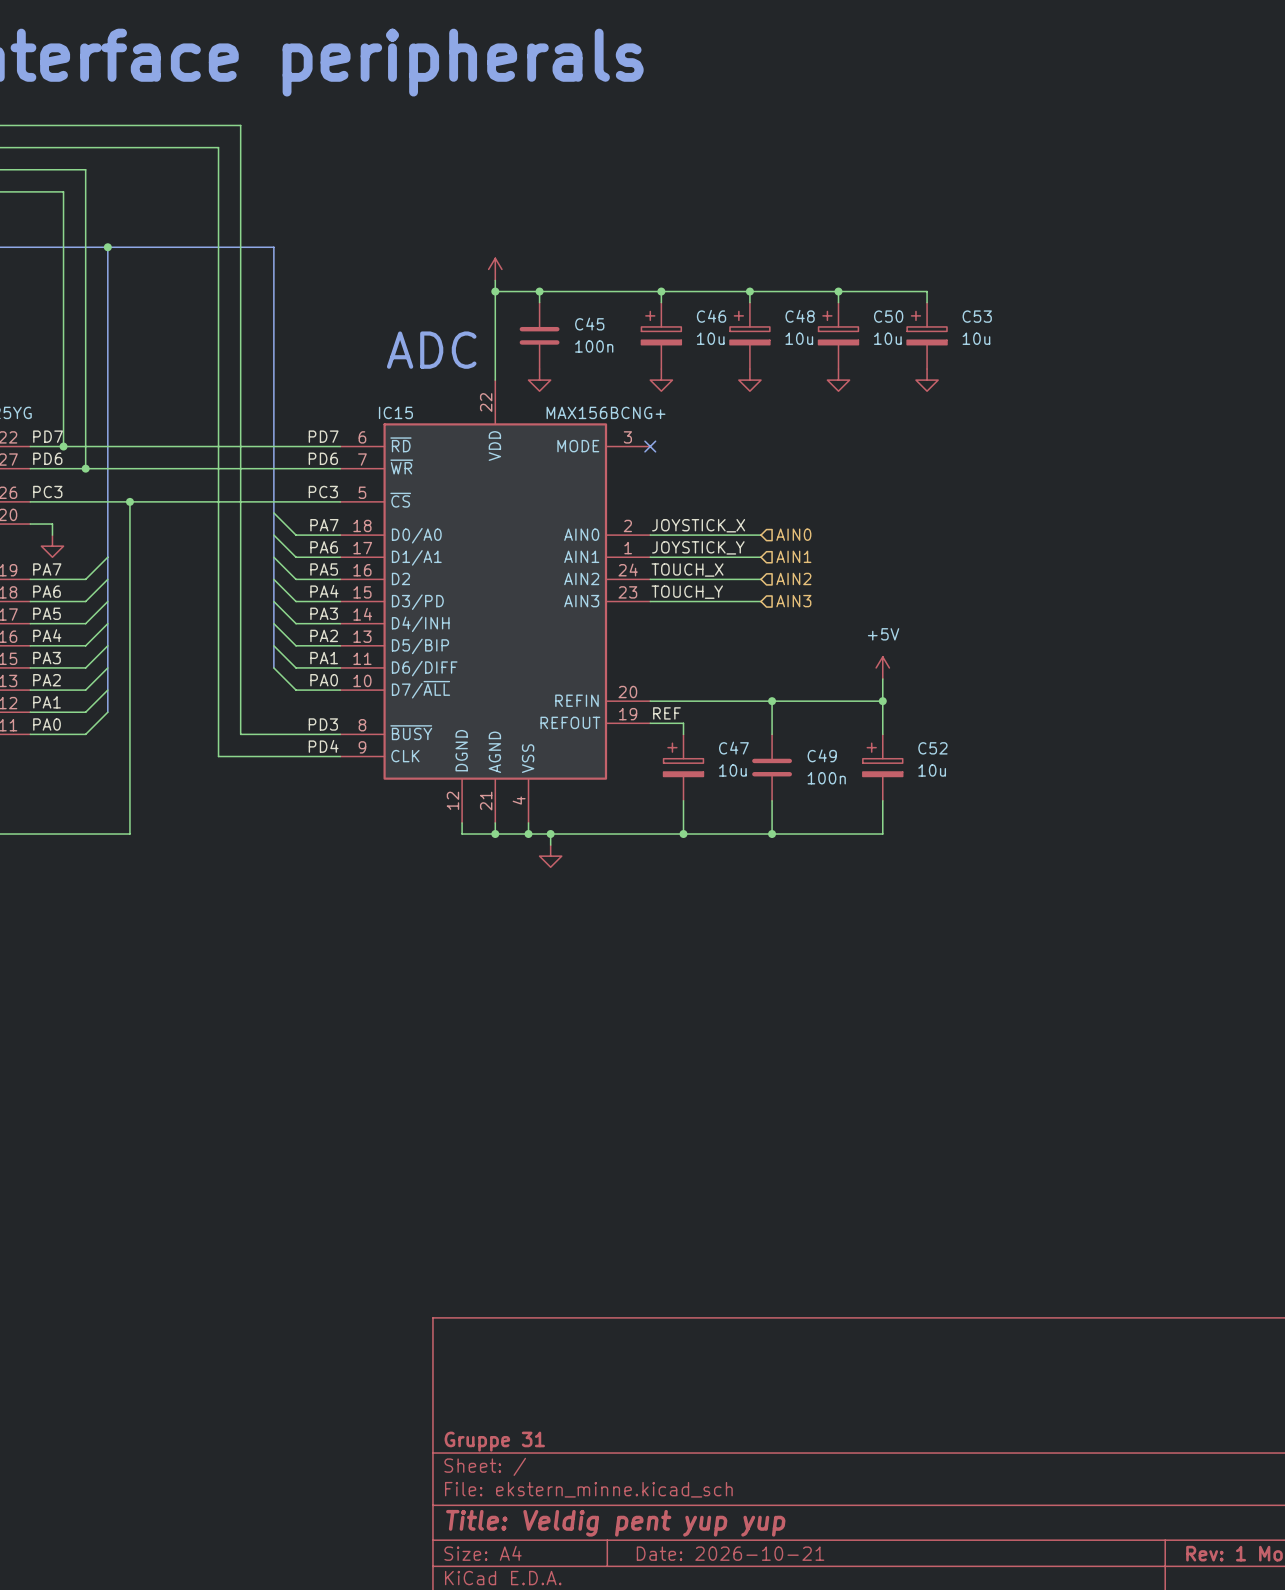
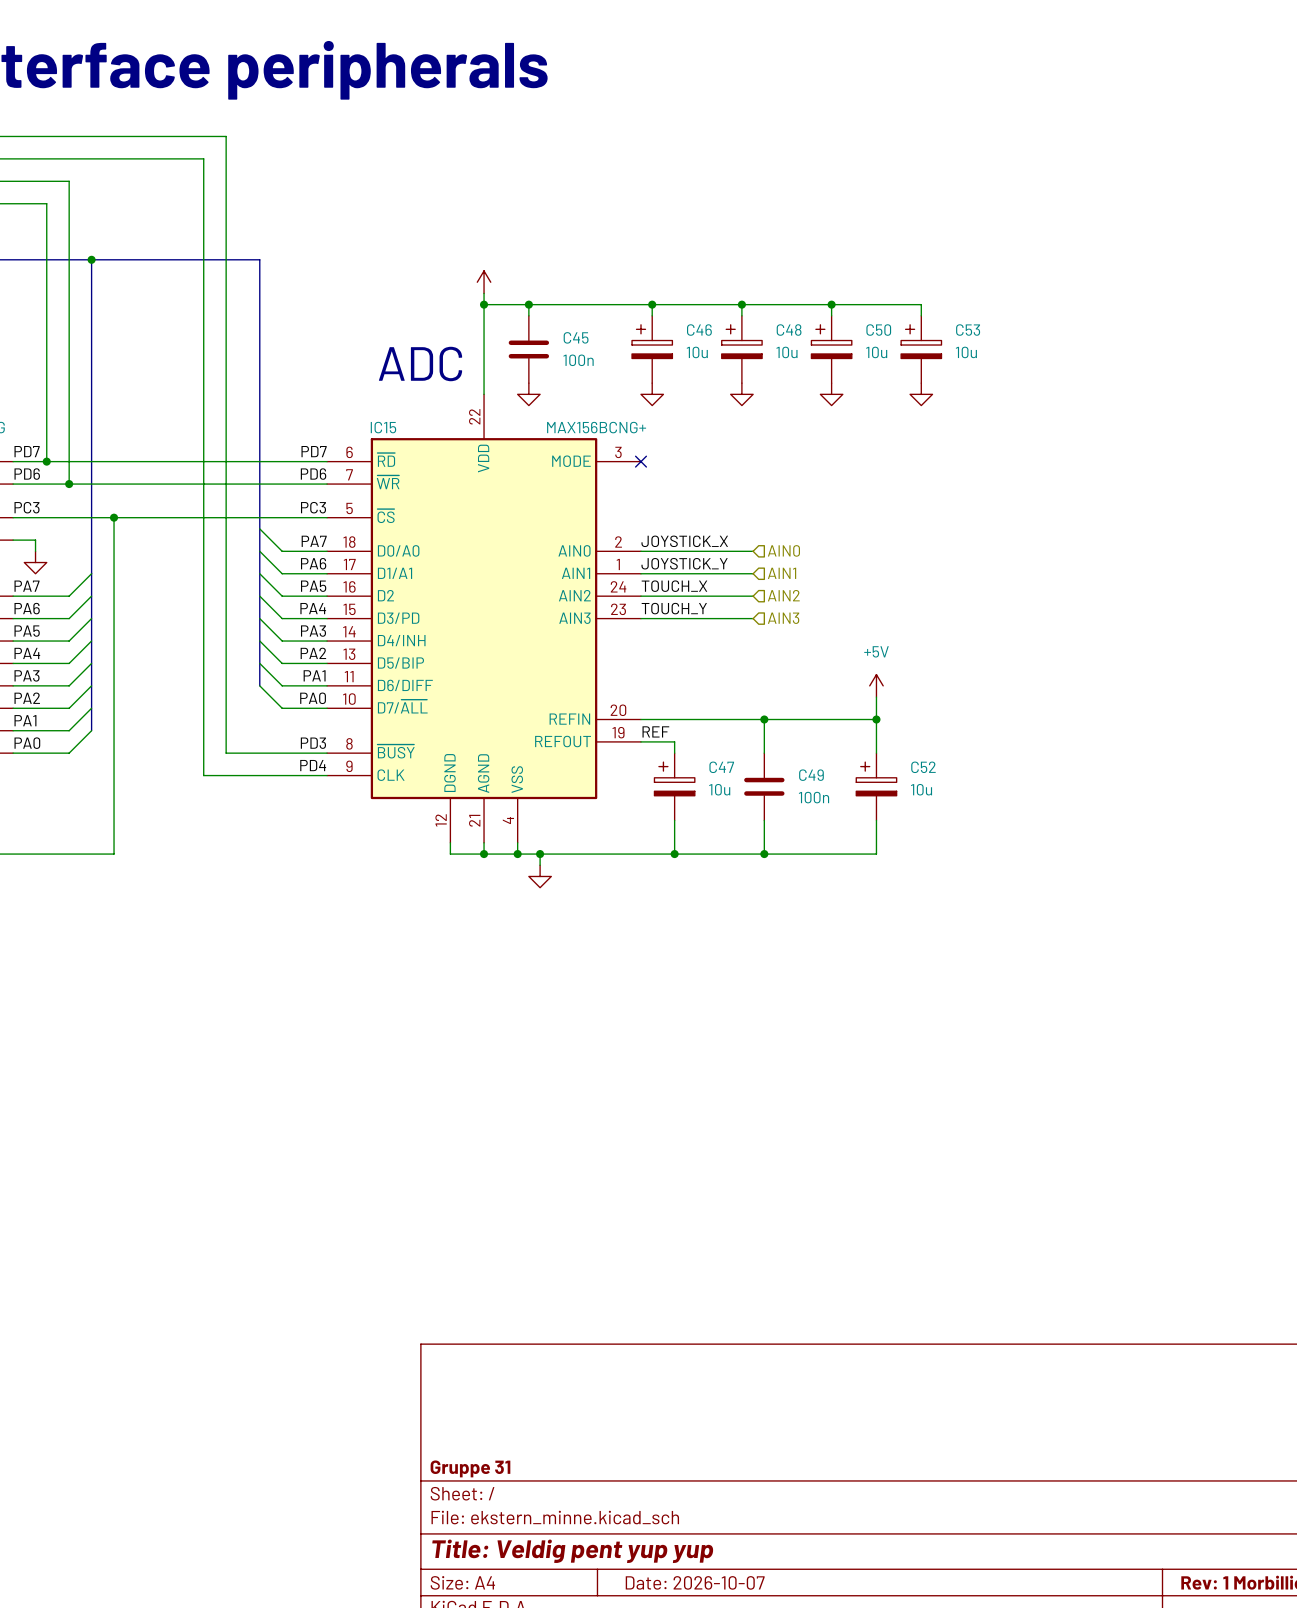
title block: Date: 2026-10-21 (730, 1553) -> Date: 2026-10-07 (695, 1582)

